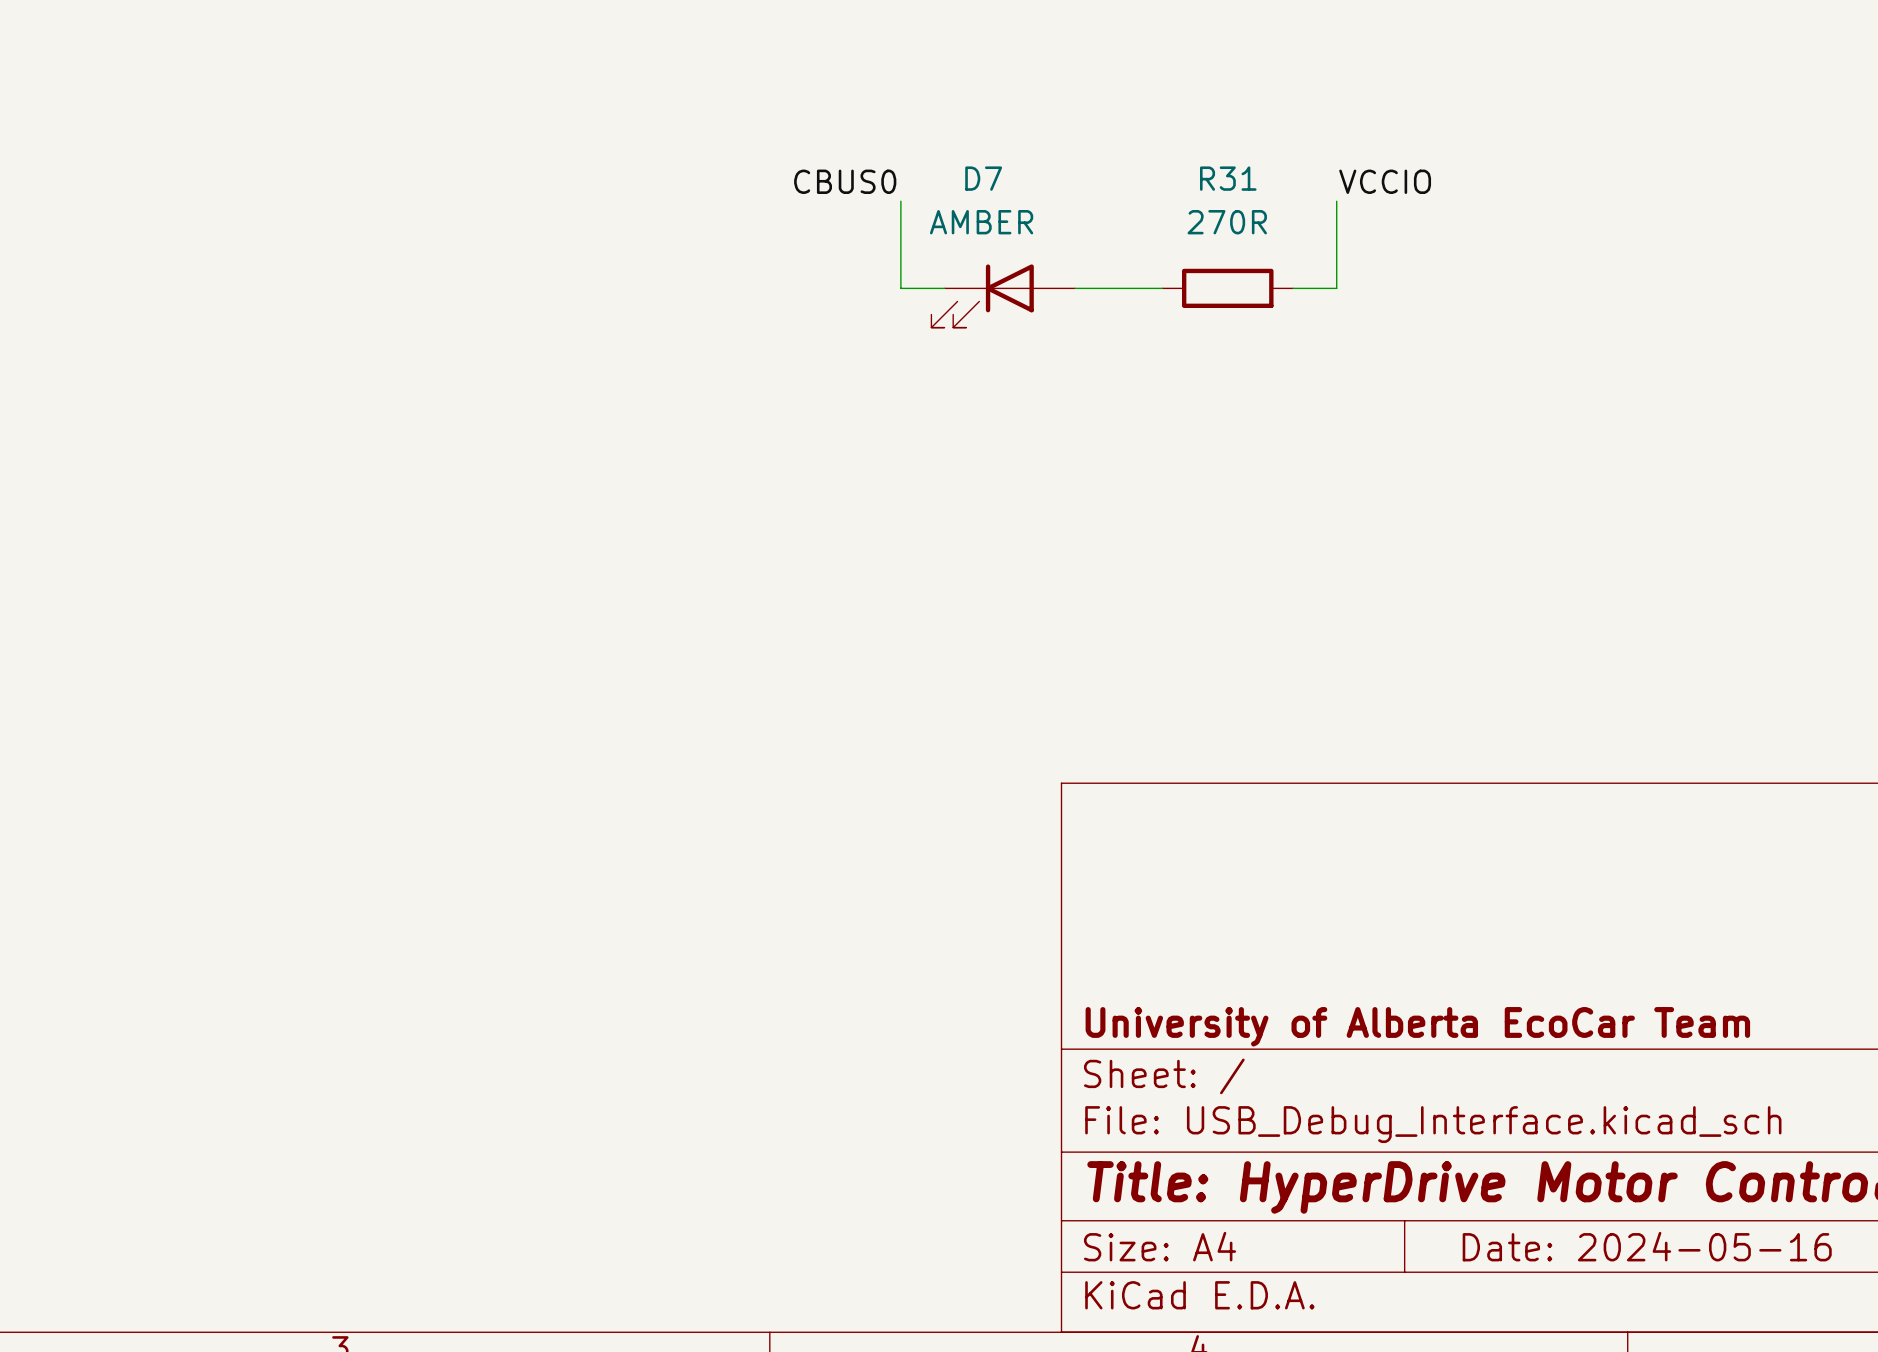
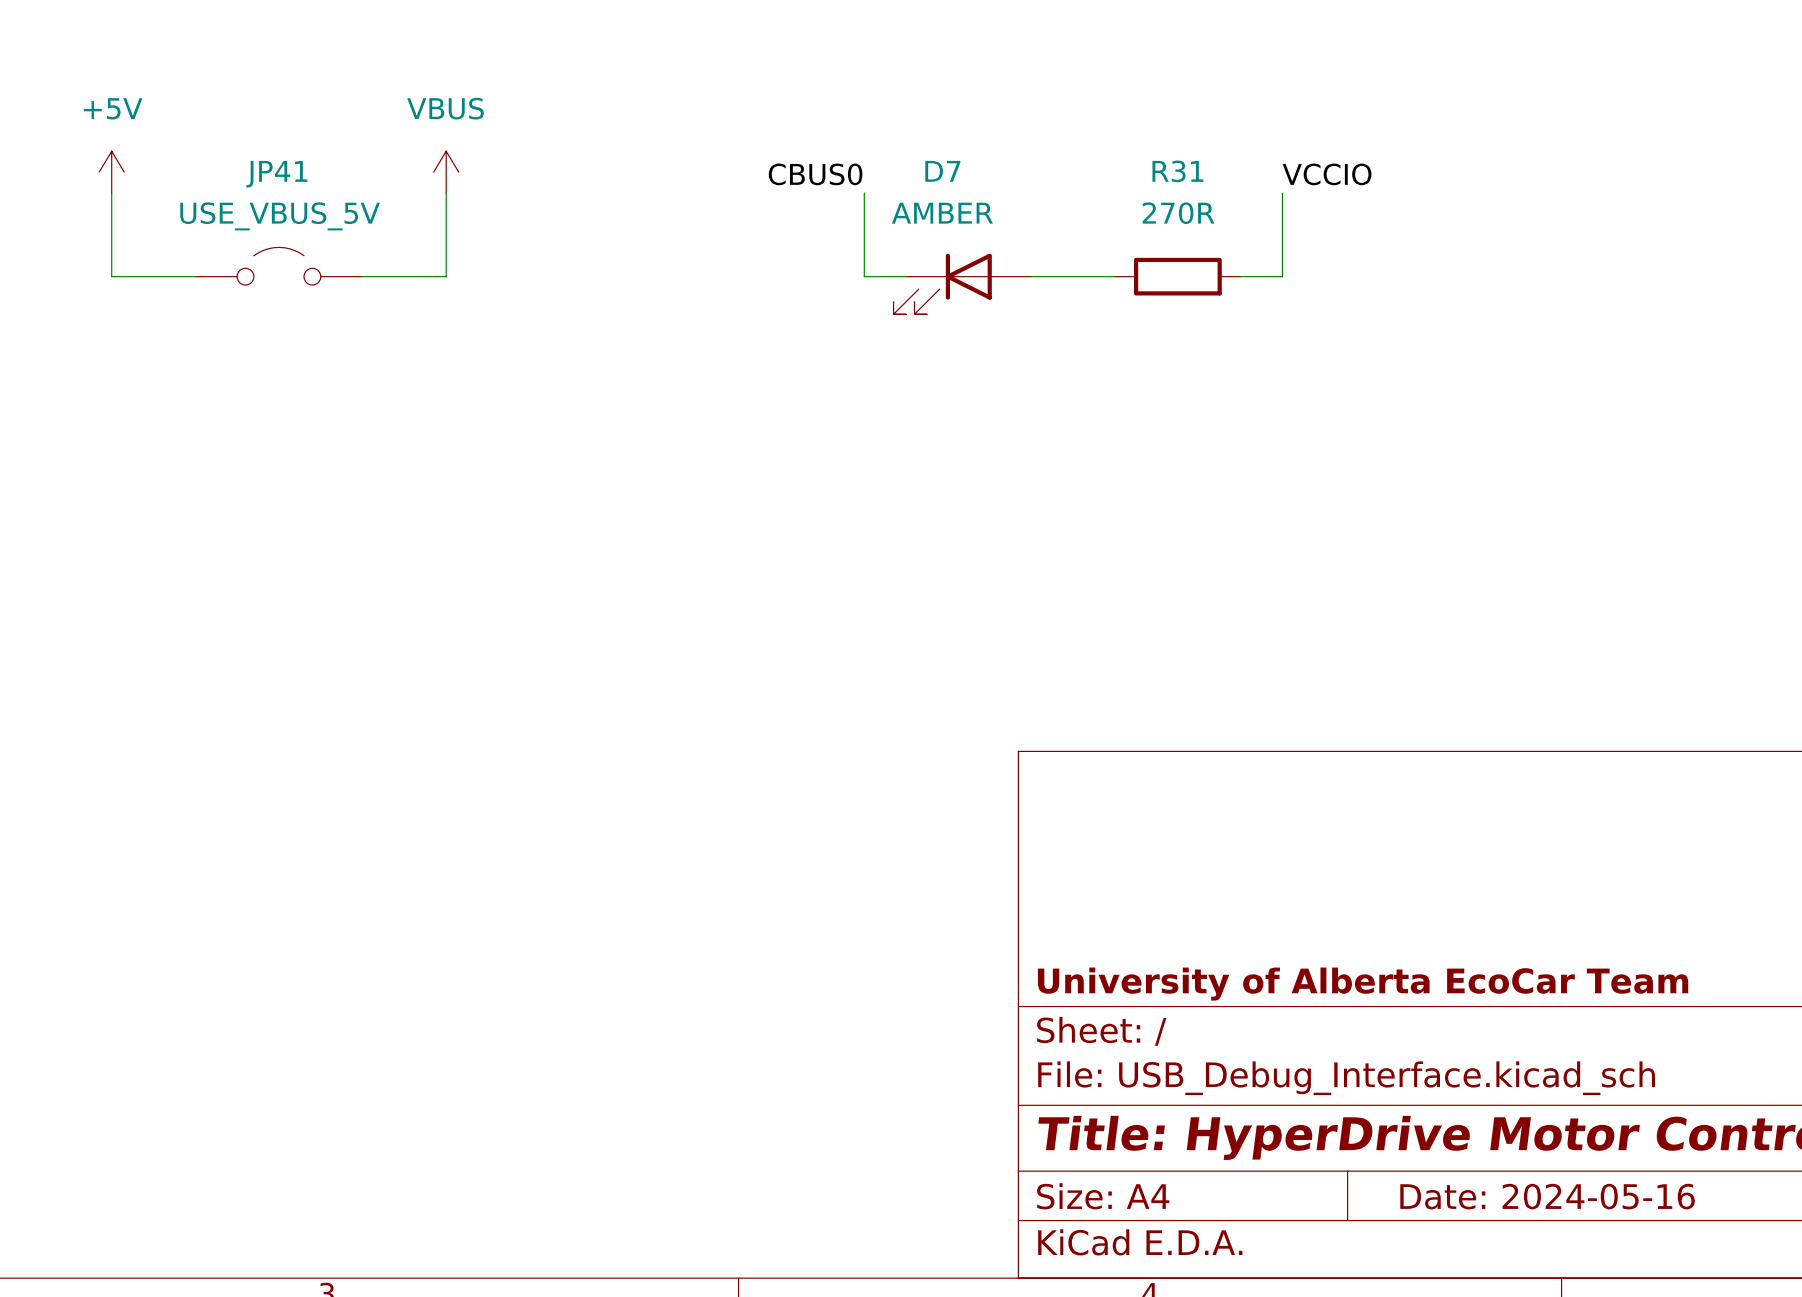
power symbol: none -> +5V (111, 172)
power symbol: none -> VBUS (446, 172)
wire: none -> (111, 193) (111, 276) (195, 276)
wire: none -> (446, 193) (446, 276) (362, 276)
JP41: none -> USE_VBUS_5V (278, 266)

